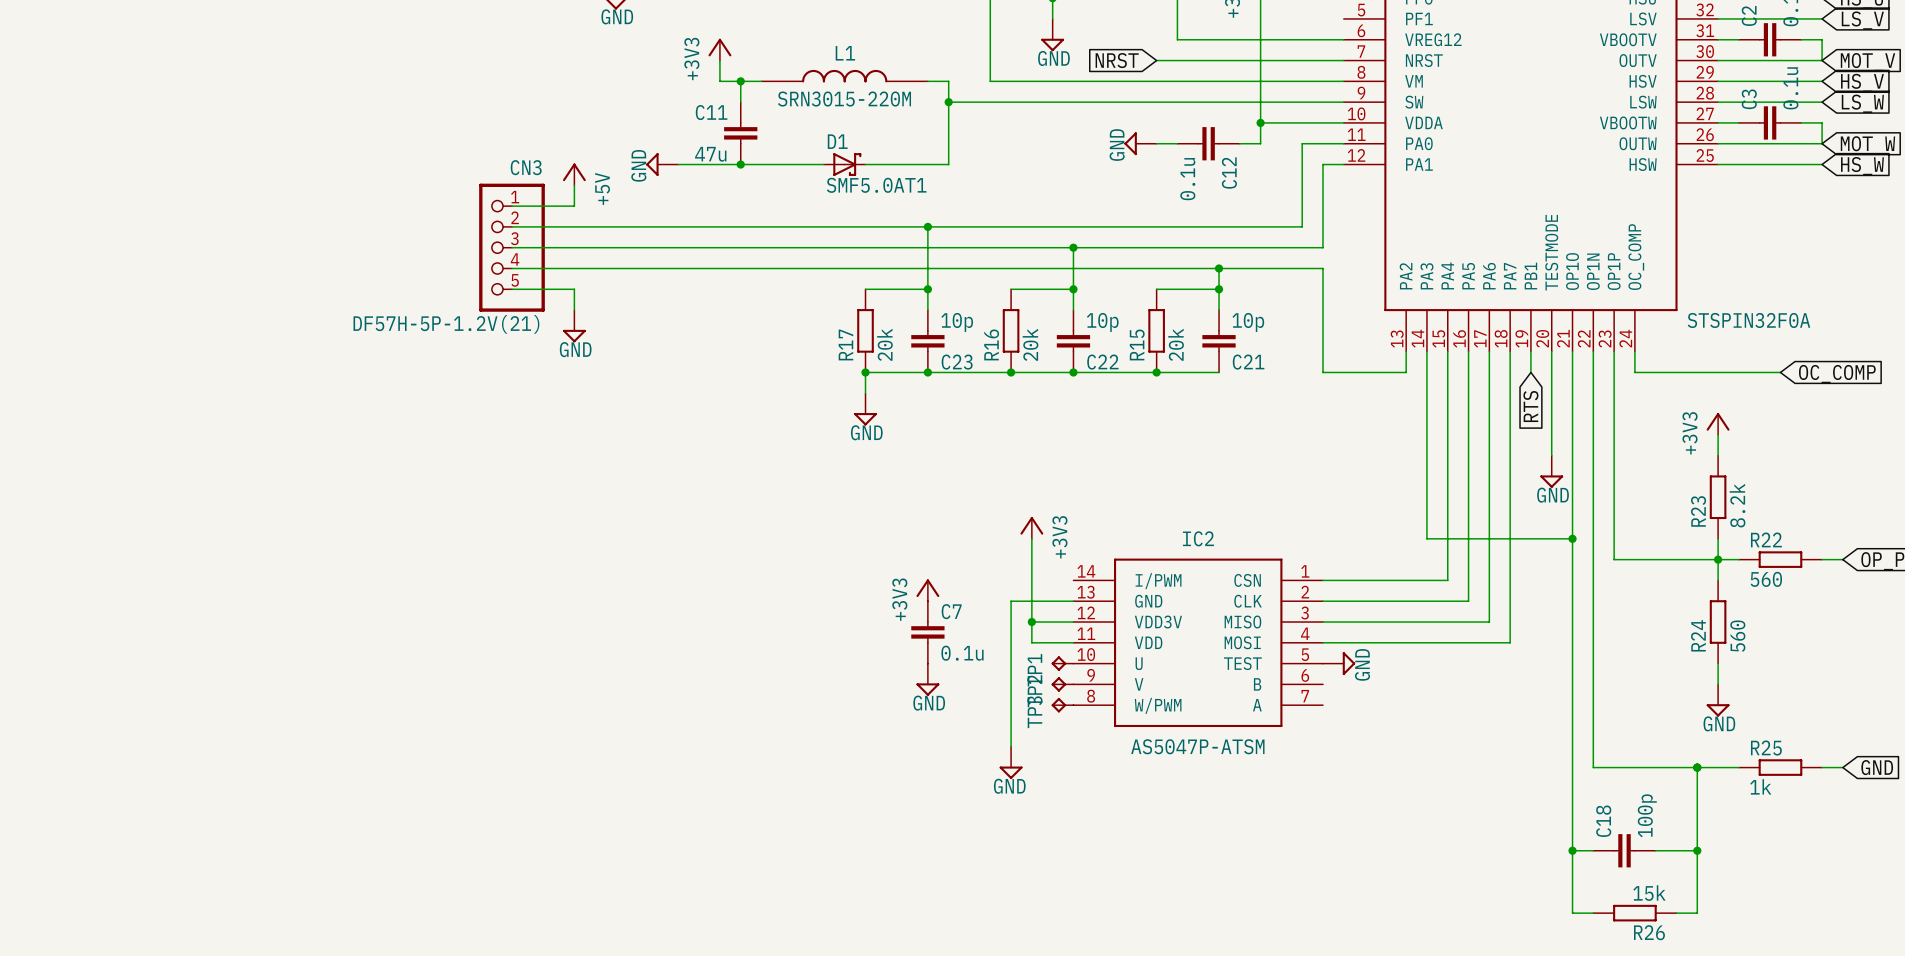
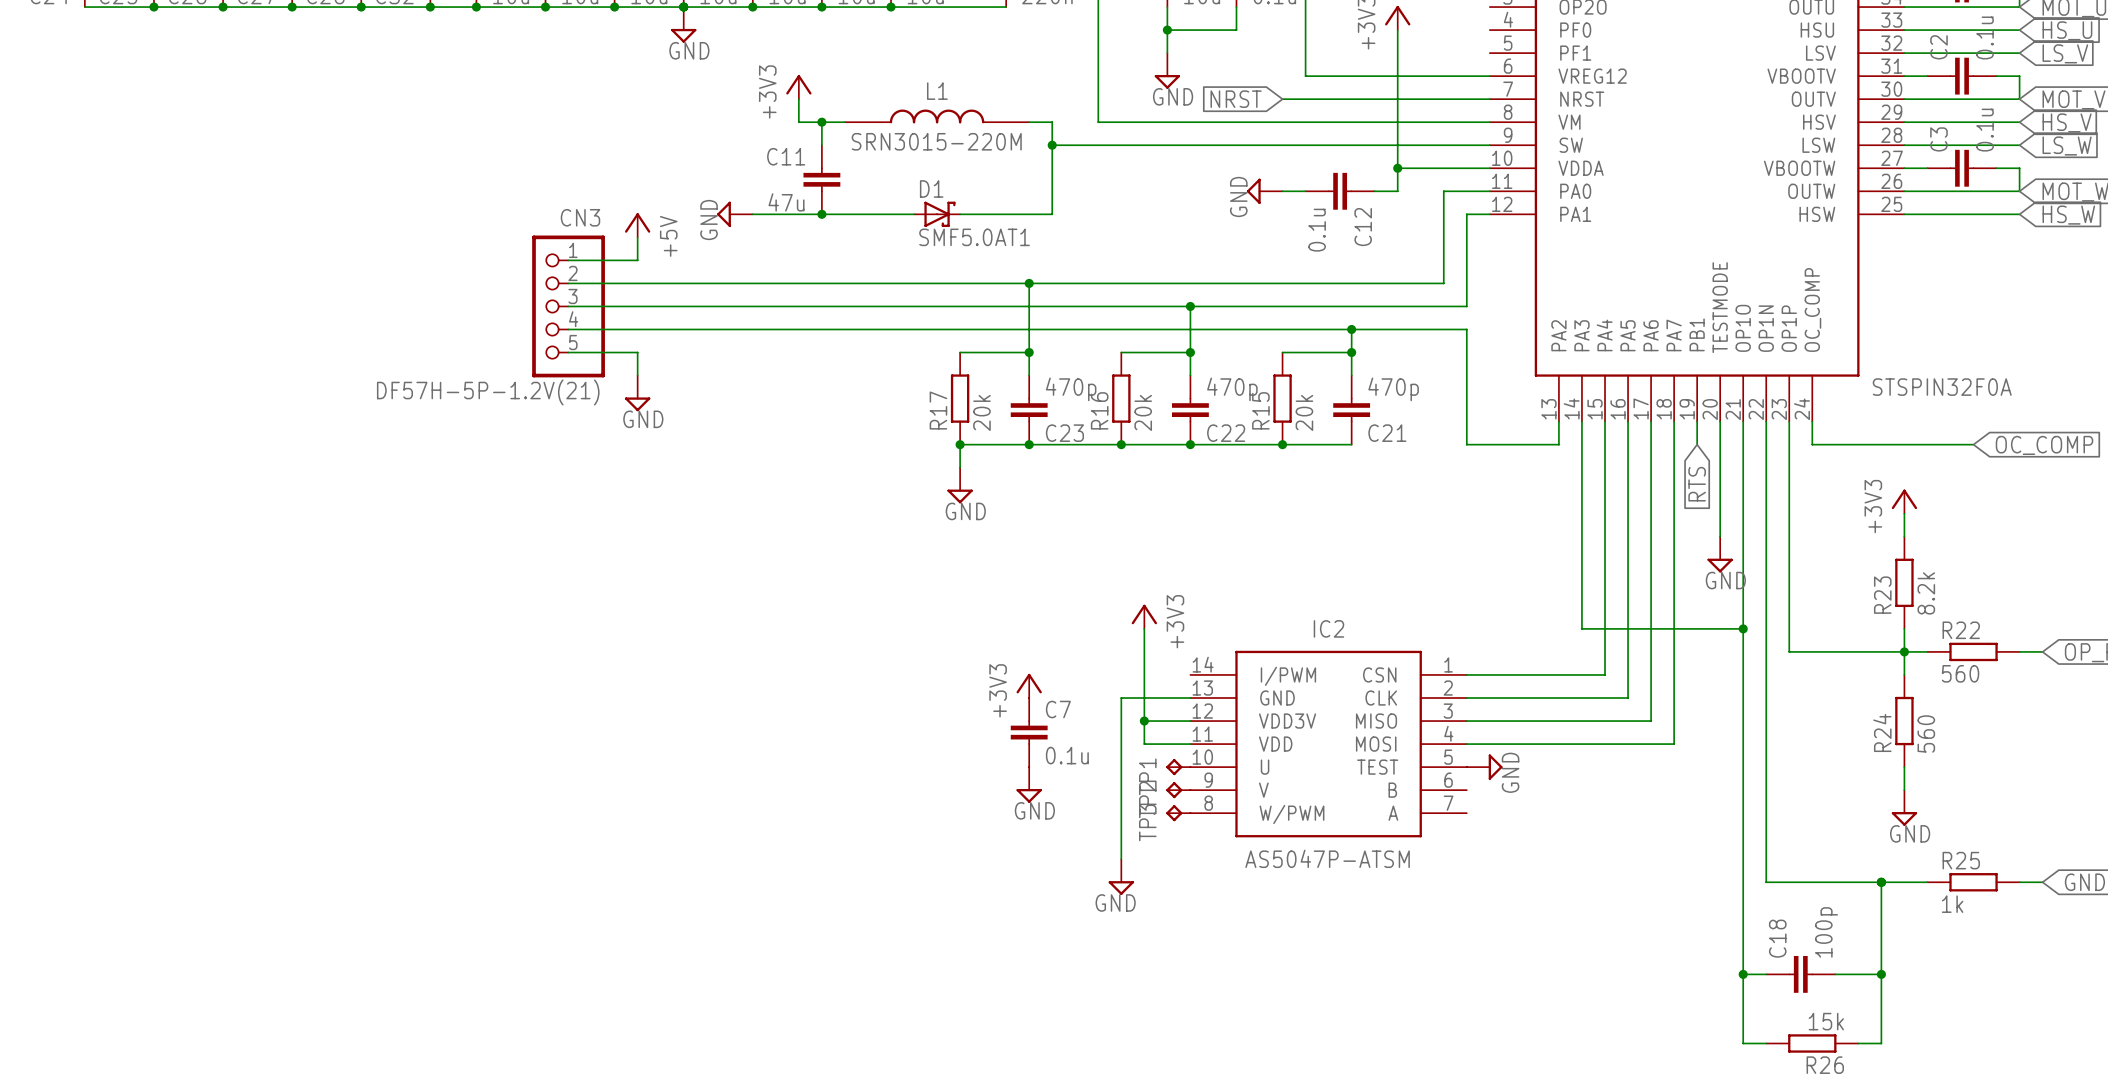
C23 value: 10p (957, 322) -> 470p (1071, 389)
C22 value: 10p (1102, 322) -> 470p (1232, 389)
C21 value: 10p (1248, 322) -> 470p (1393, 389)

